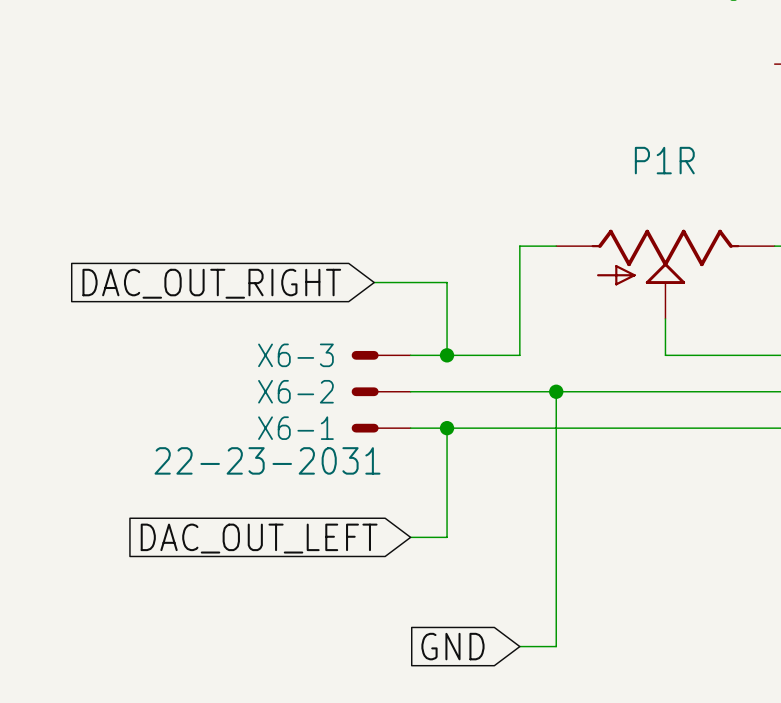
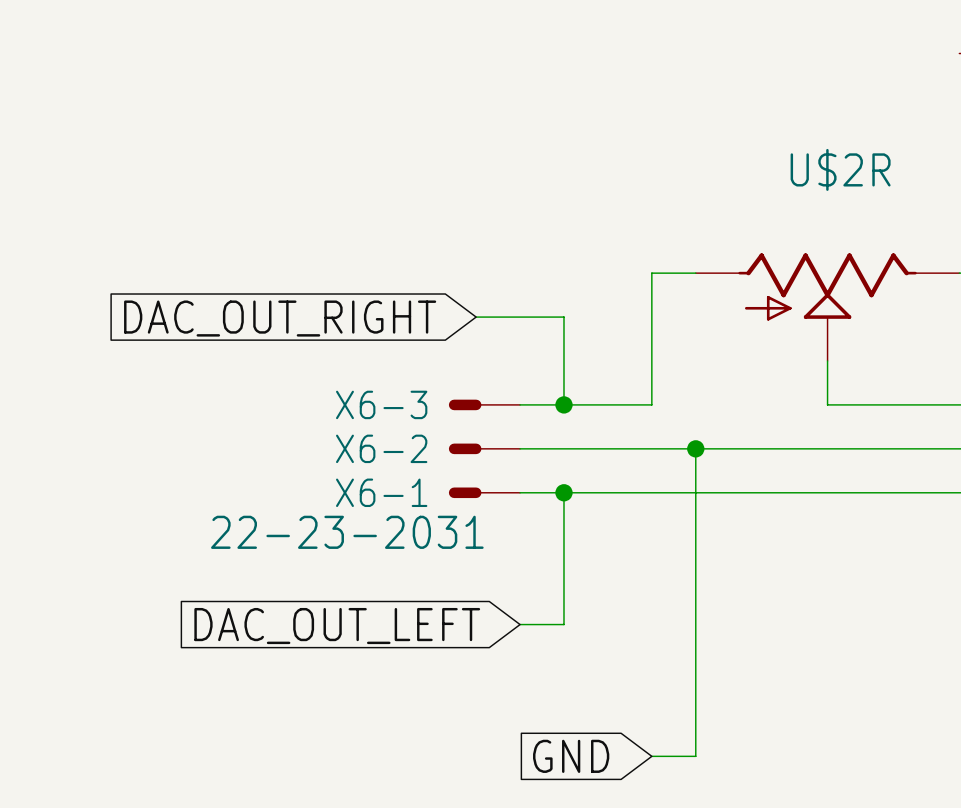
P1R name: P1R (664, 160) -> U$2R (840, 169)

